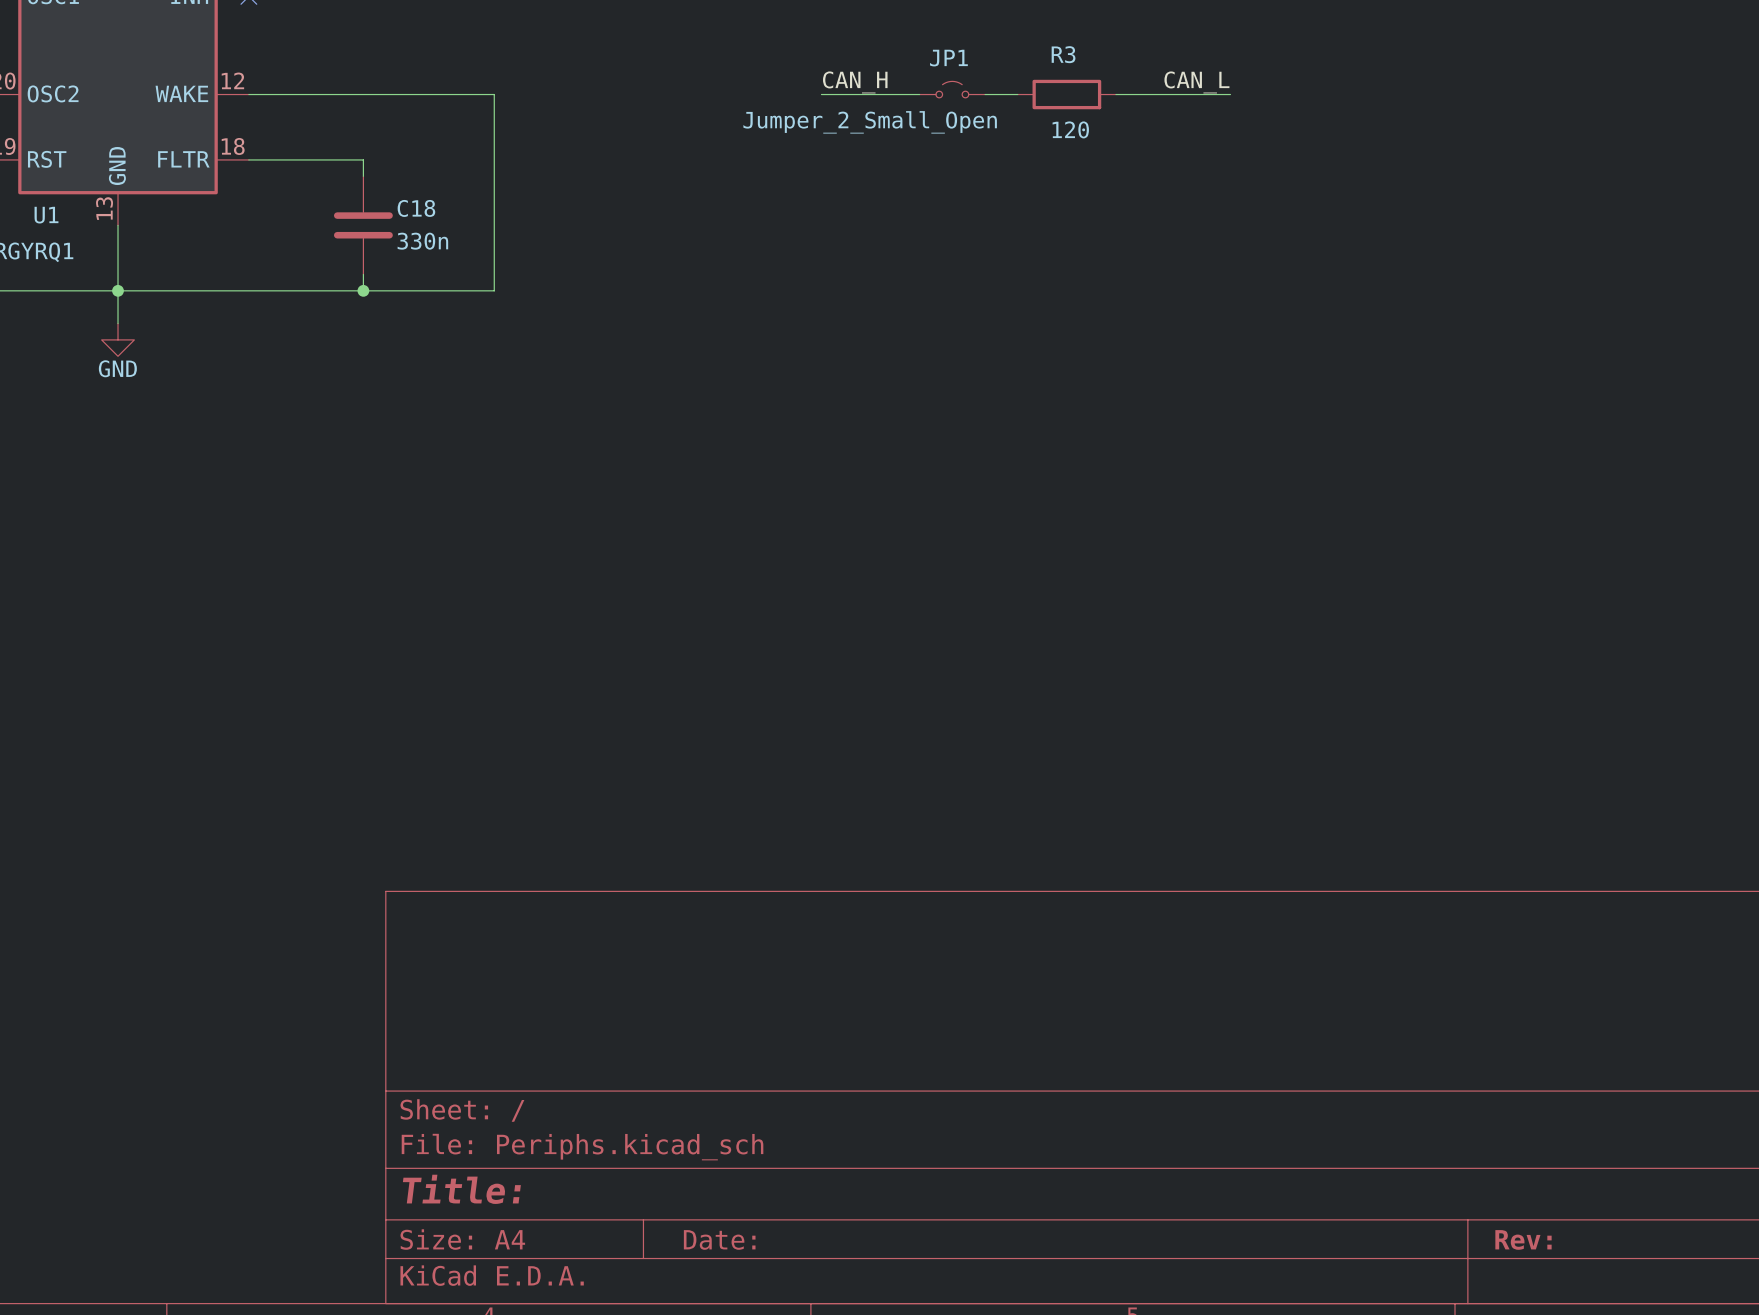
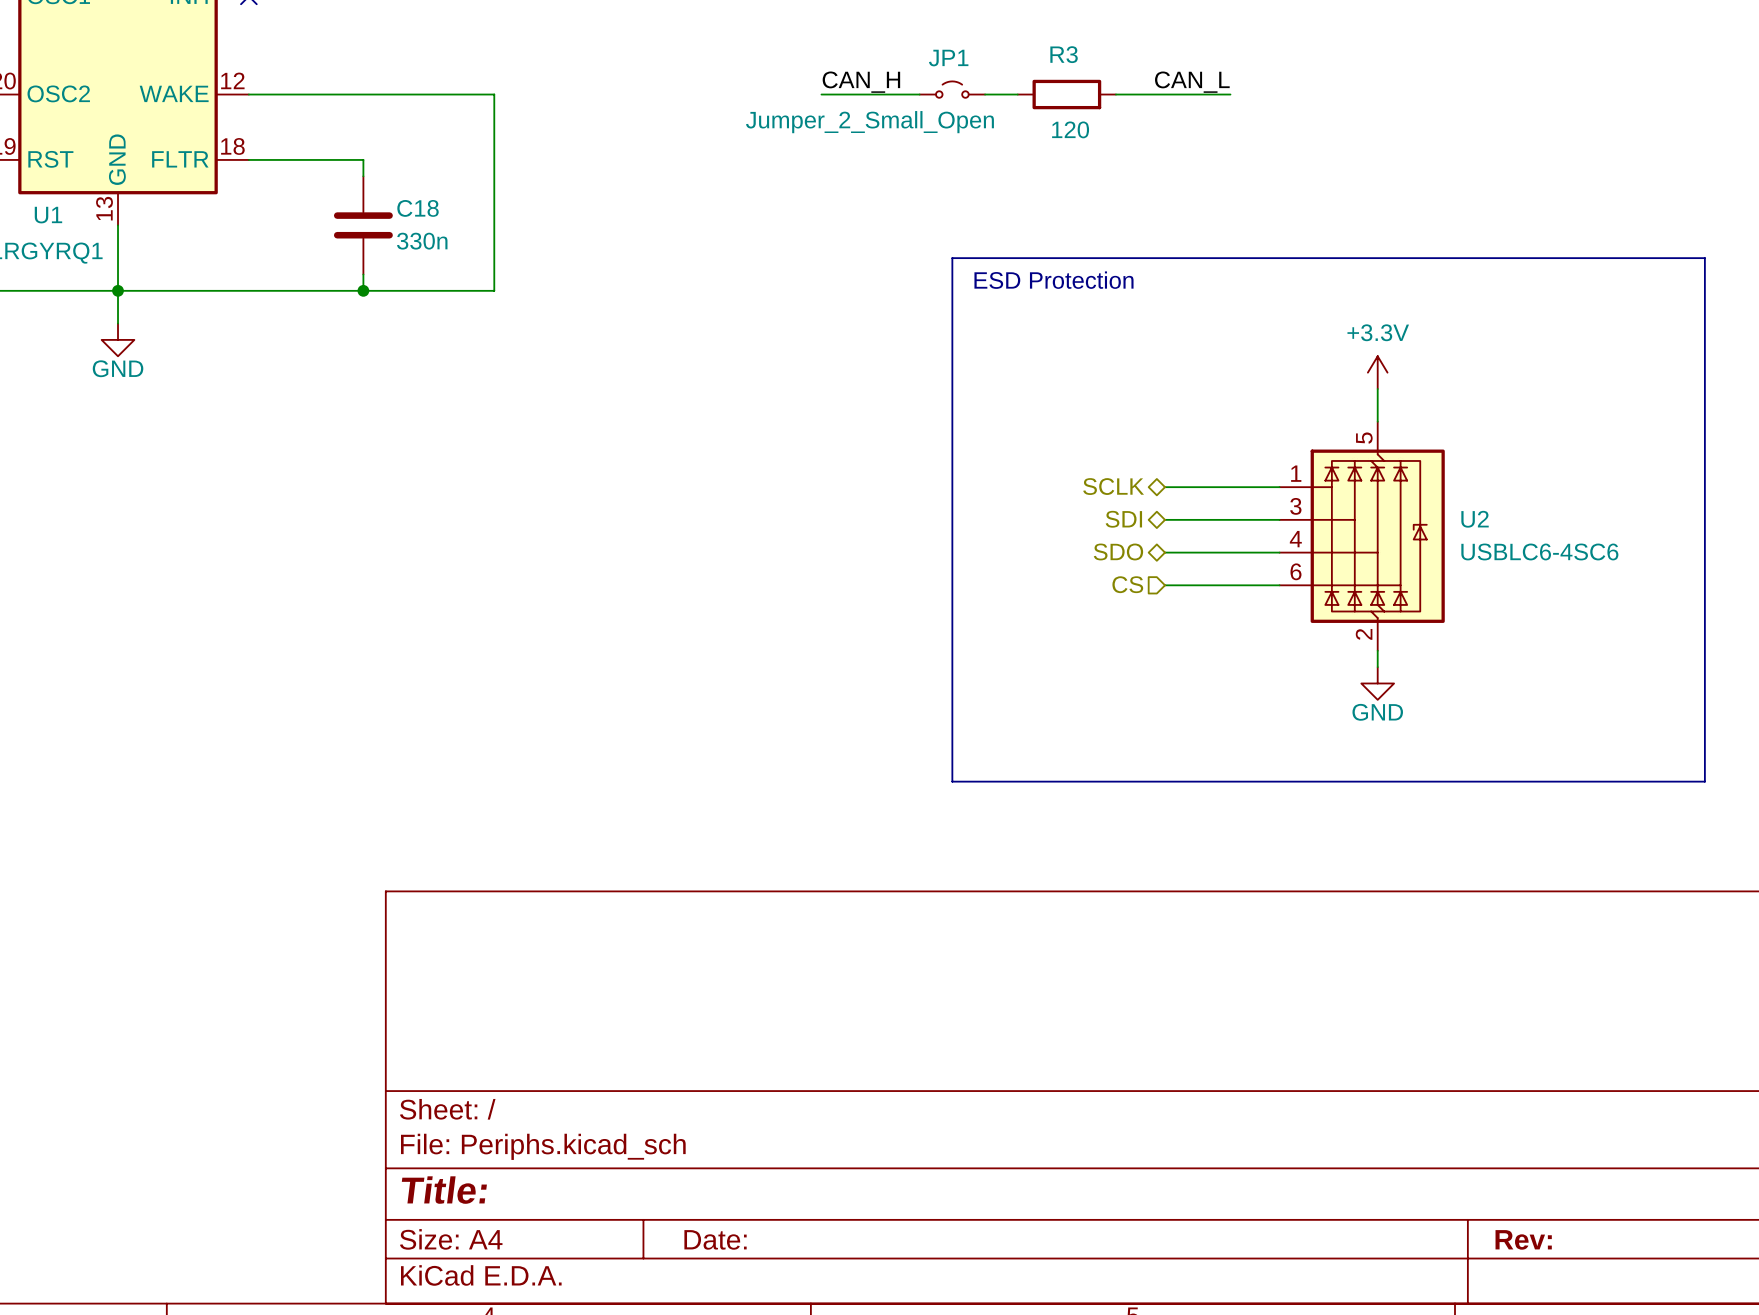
line: none -> (952, 258) (1704, 258) (1704, 781) (952, 781) (952, 258)
text: none -> ESD Protection (1053, 280)
power symbol: none -> +3.3V (1377, 372)
wire: none -> (1377, 389) (1377, 421)
hierarchical label: none -> SCLK (1113, 486)
wire: none -> (1165, 487) (1279, 487)
hierarchical label: none -> SDI (1123, 519)
wire: none -> (1165, 519) (1279, 519)
U2: none -> USBLC6-4SC6 (1362, 536)
hierarchical label: none -> SDO (1118, 551)
wire: none -> (1165, 552) (1279, 552)
hierarchical label: none -> CS (1127, 584)
wire: none -> (1165, 585) (1279, 585)
wire: none -> (1377, 650) (1377, 667)
power symbol: none -> GND (1377, 683)

